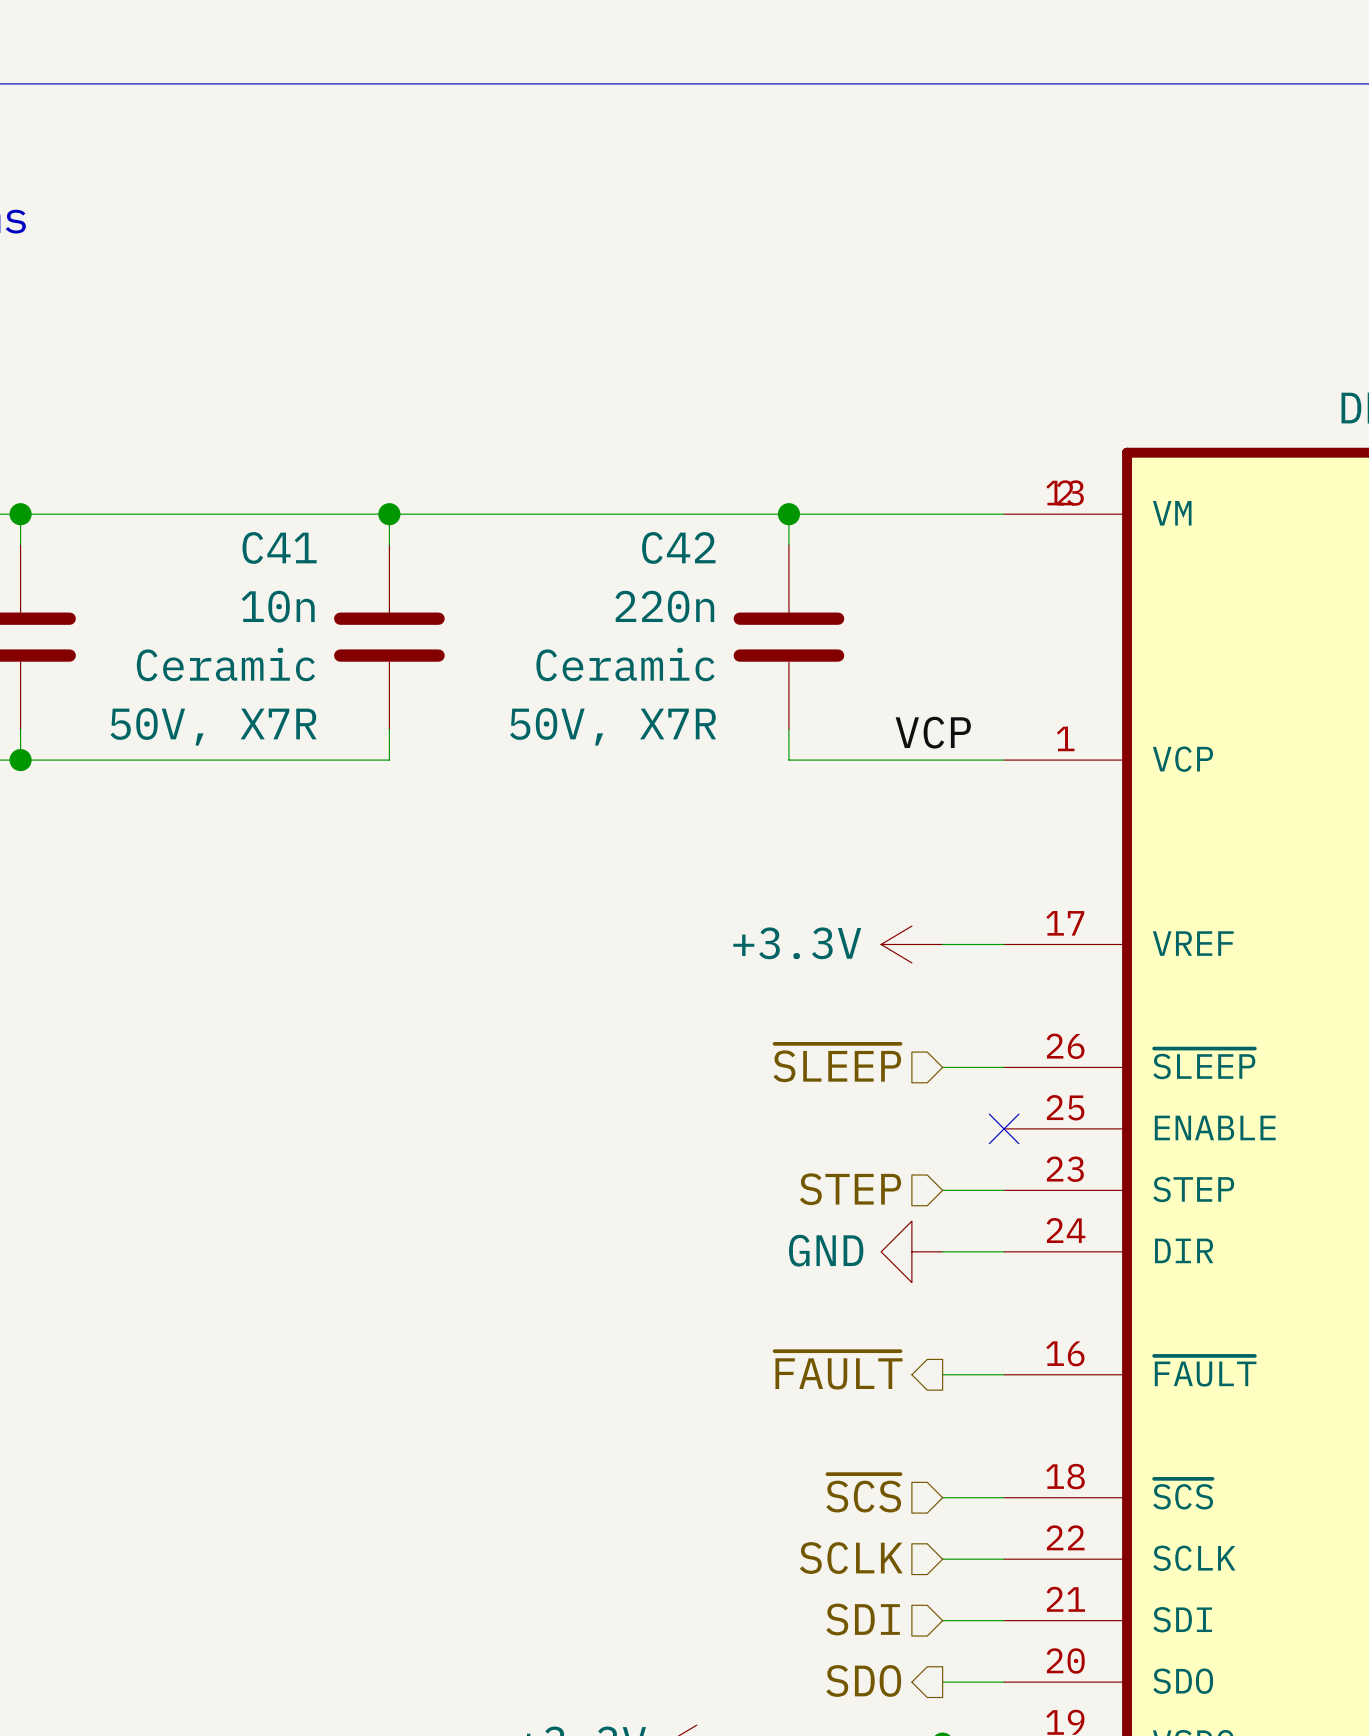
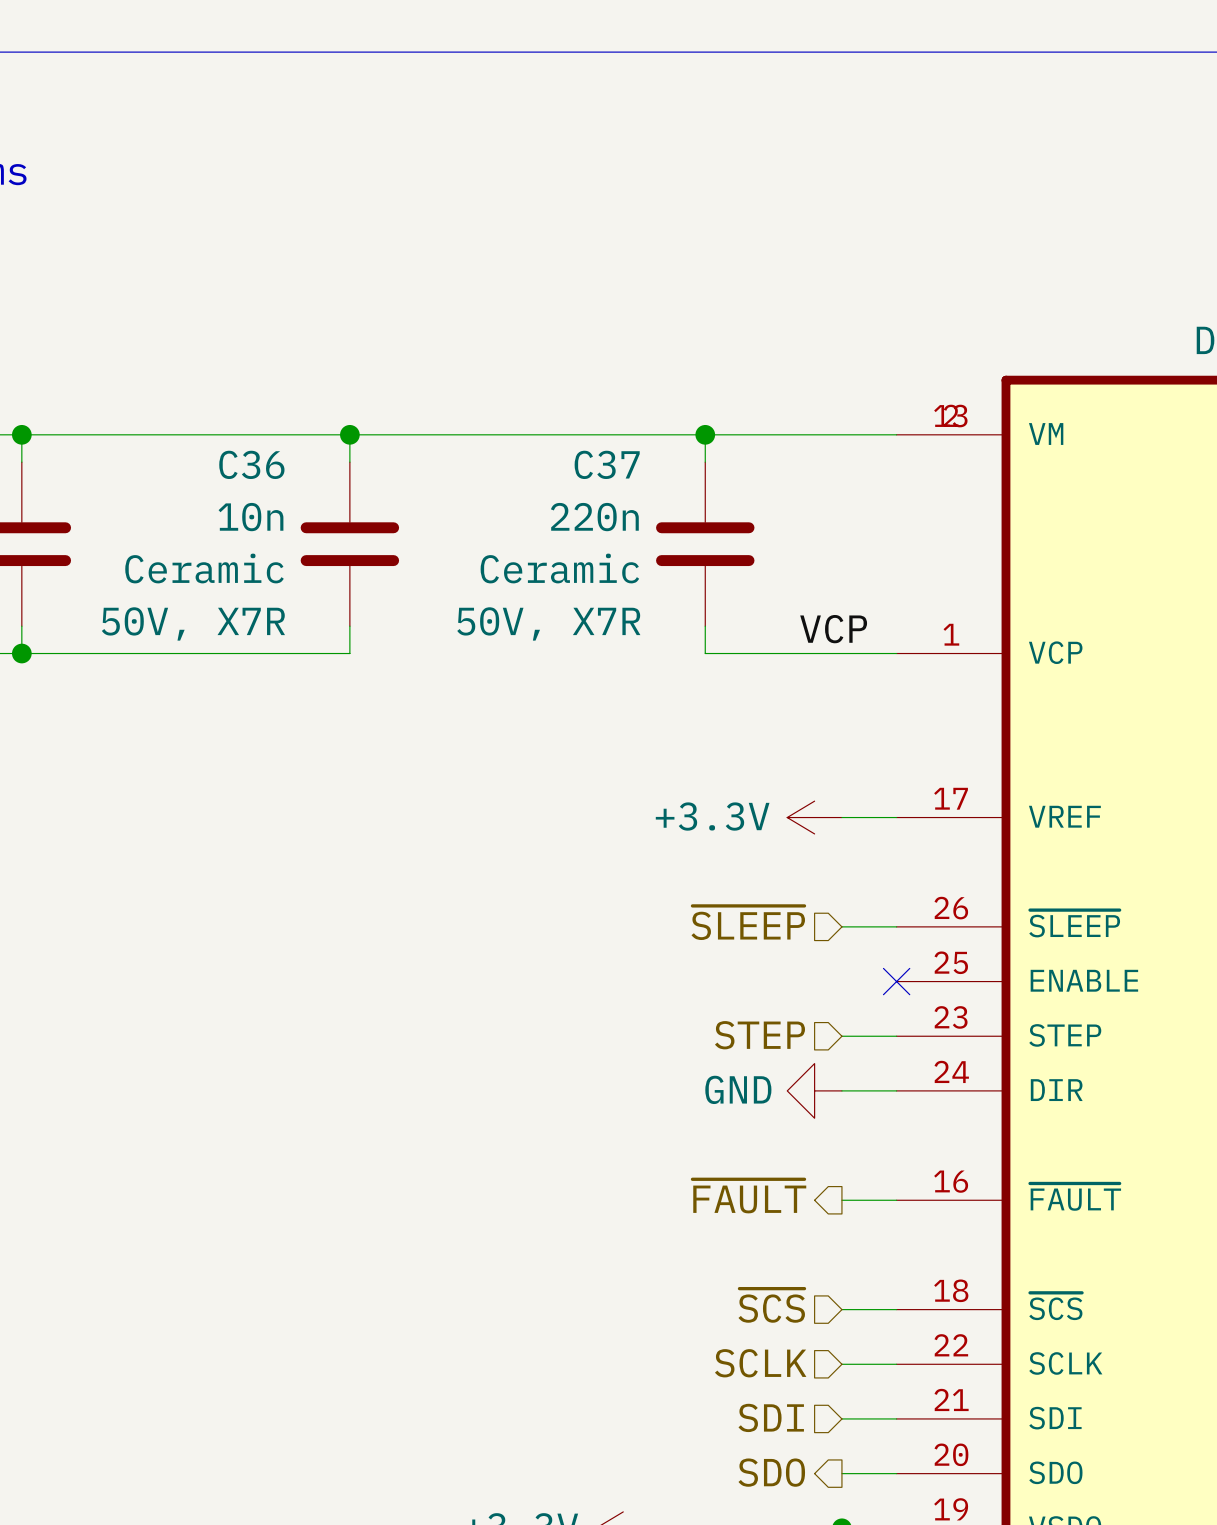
C41 name: C41 (279, 547) -> C36 (251, 464)
C42 name: C42 (678, 547) -> C37 (607, 464)

